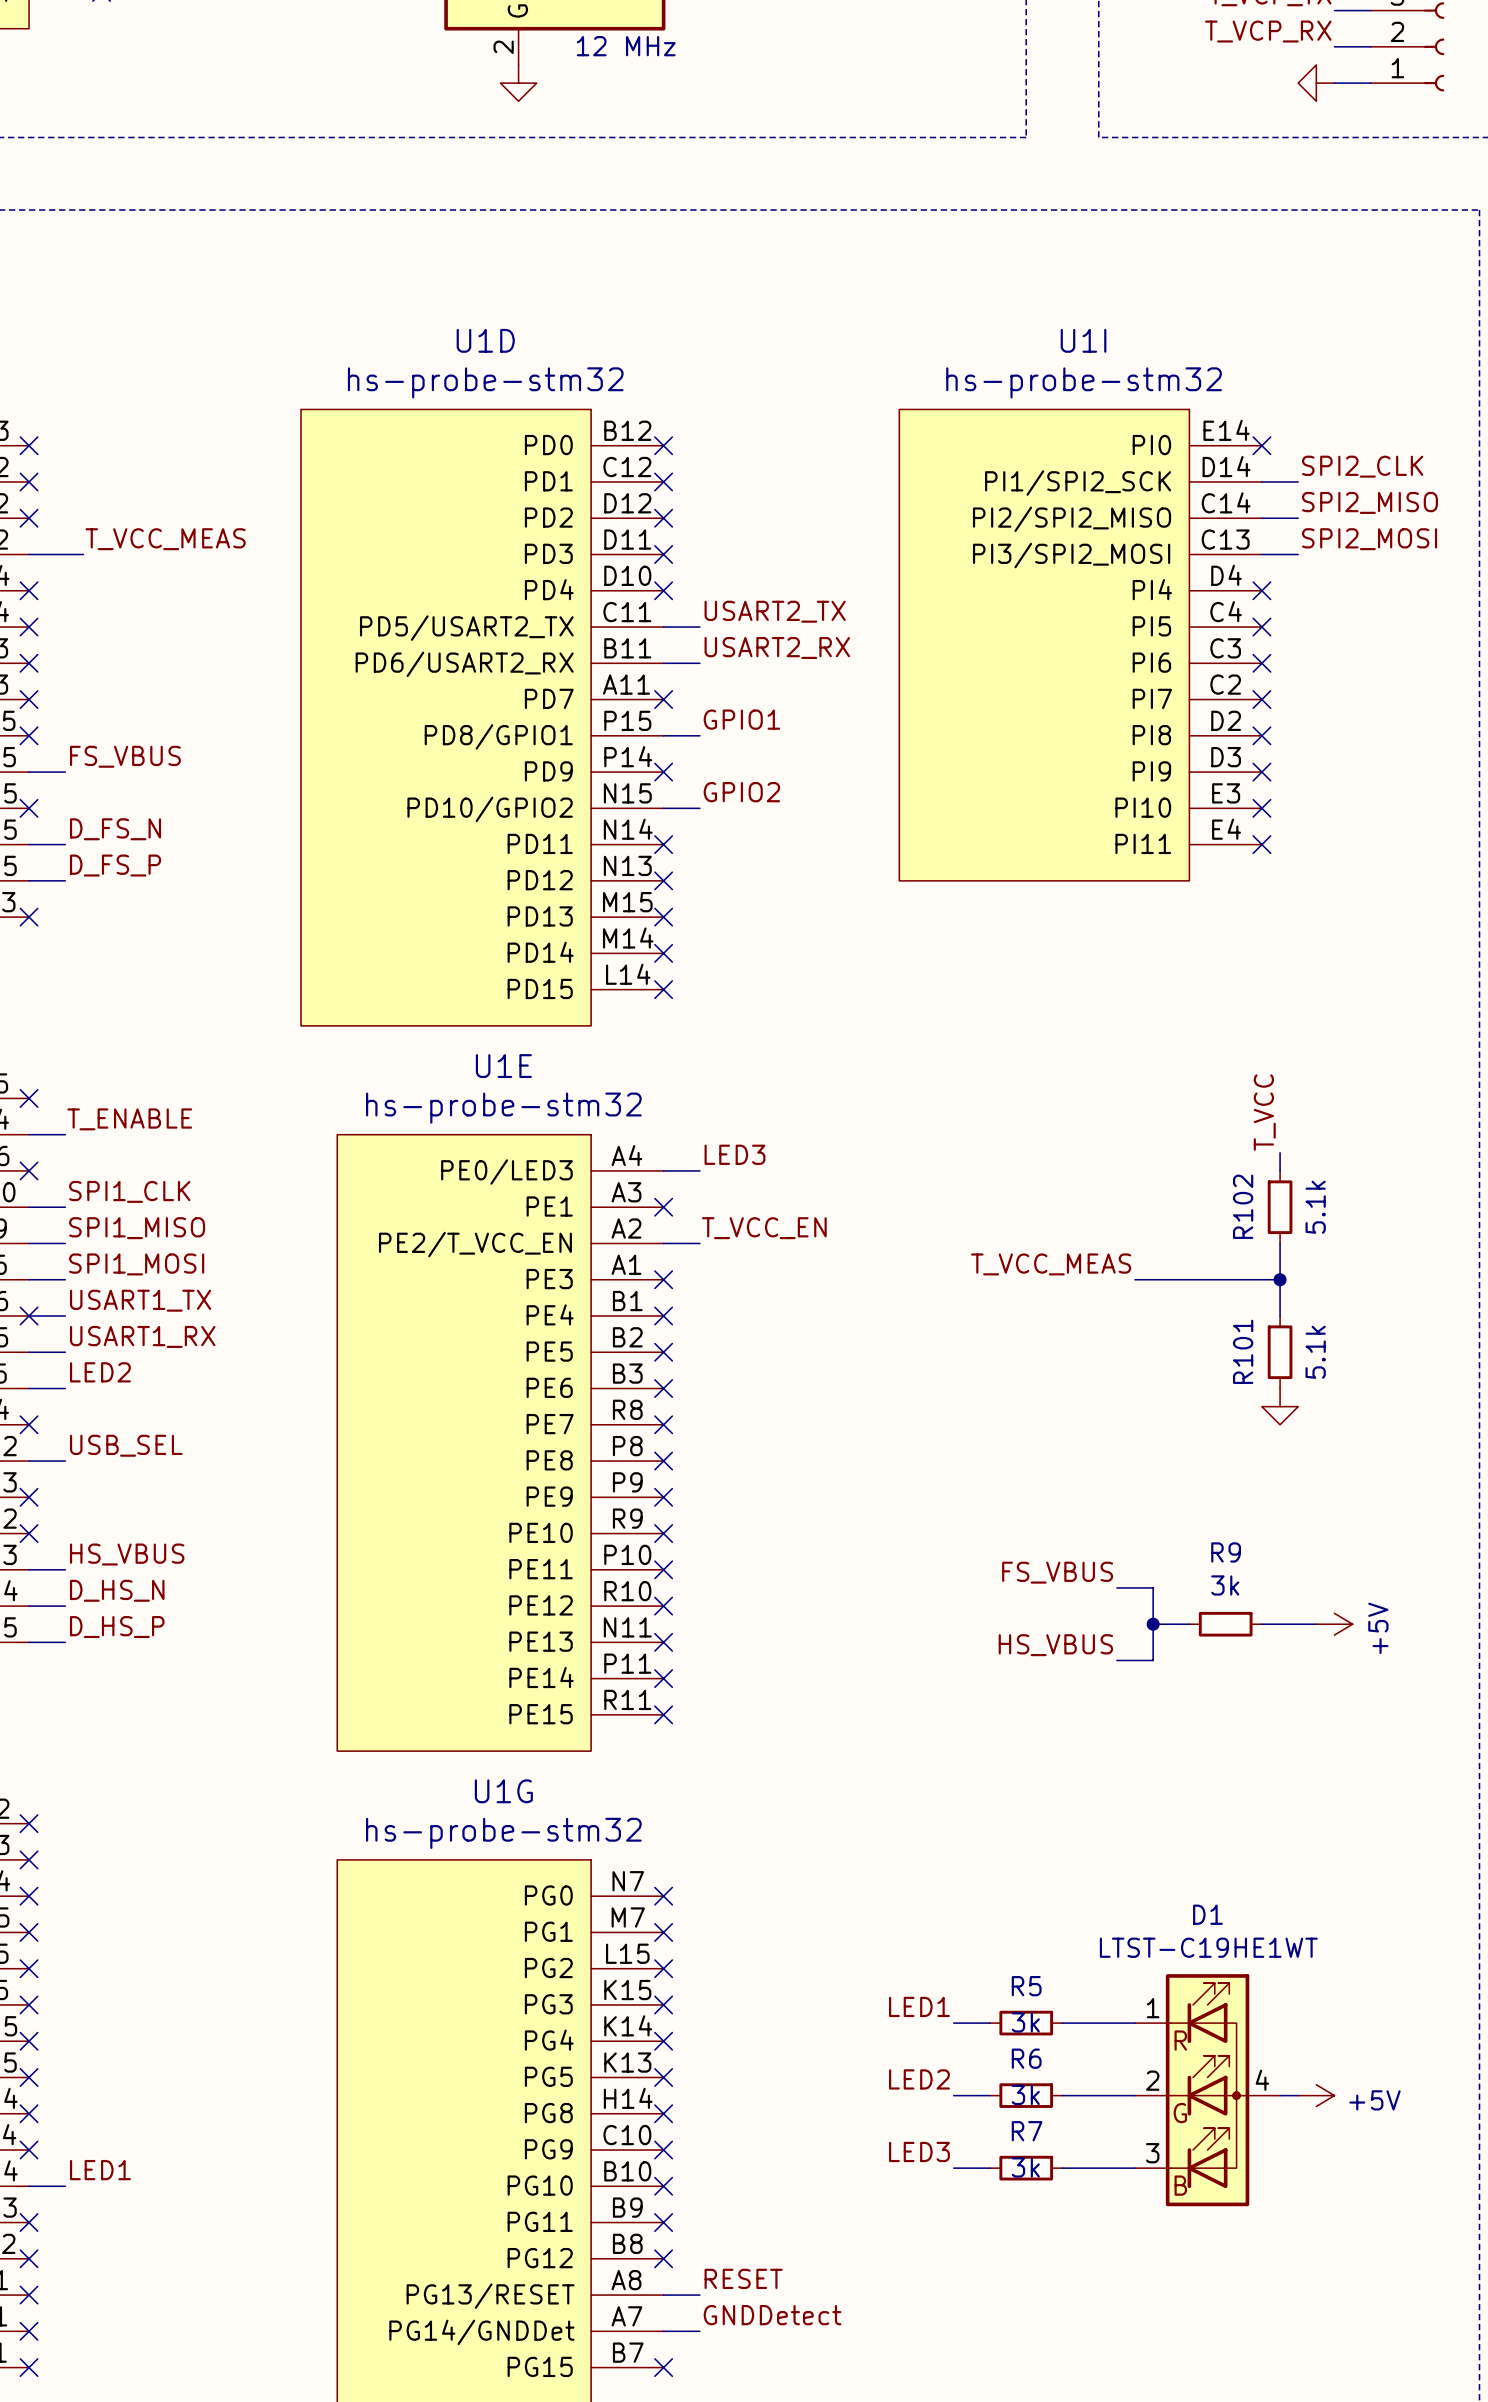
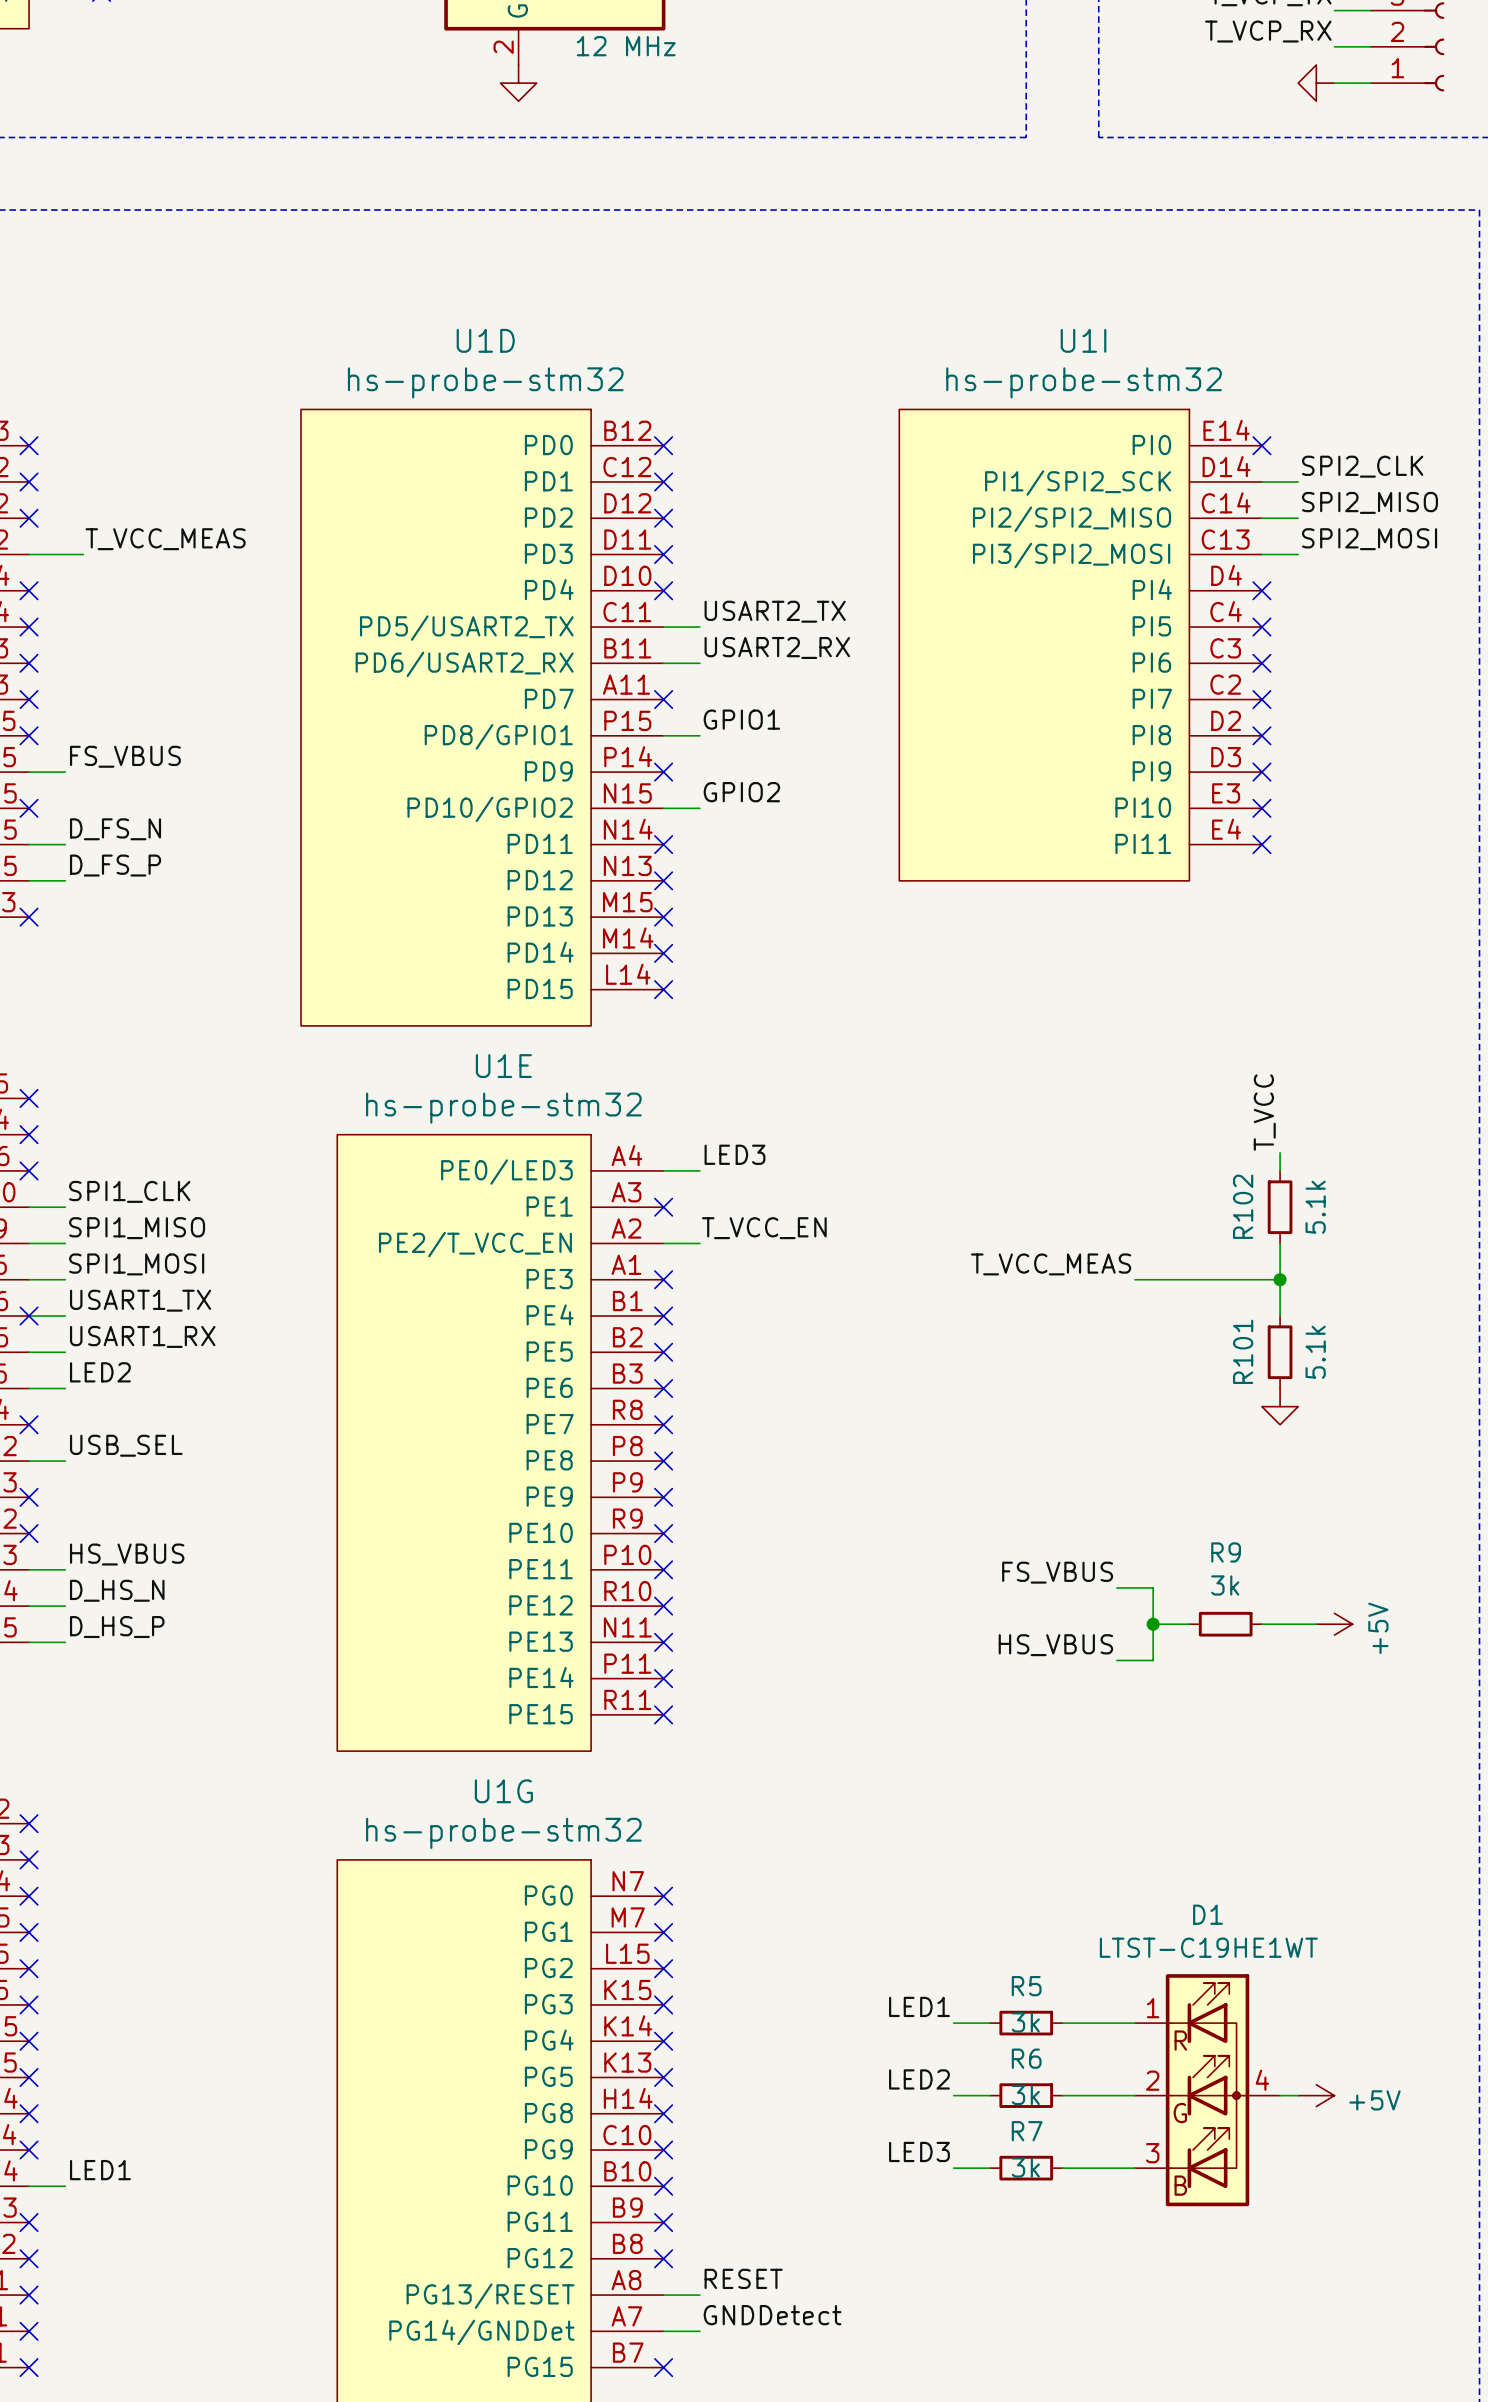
label: T_ENABLE (129, 1119) -> none
wire: (29, 1134) (65, 1134) -> none
no-connect mark: none -> (29, 1134)

